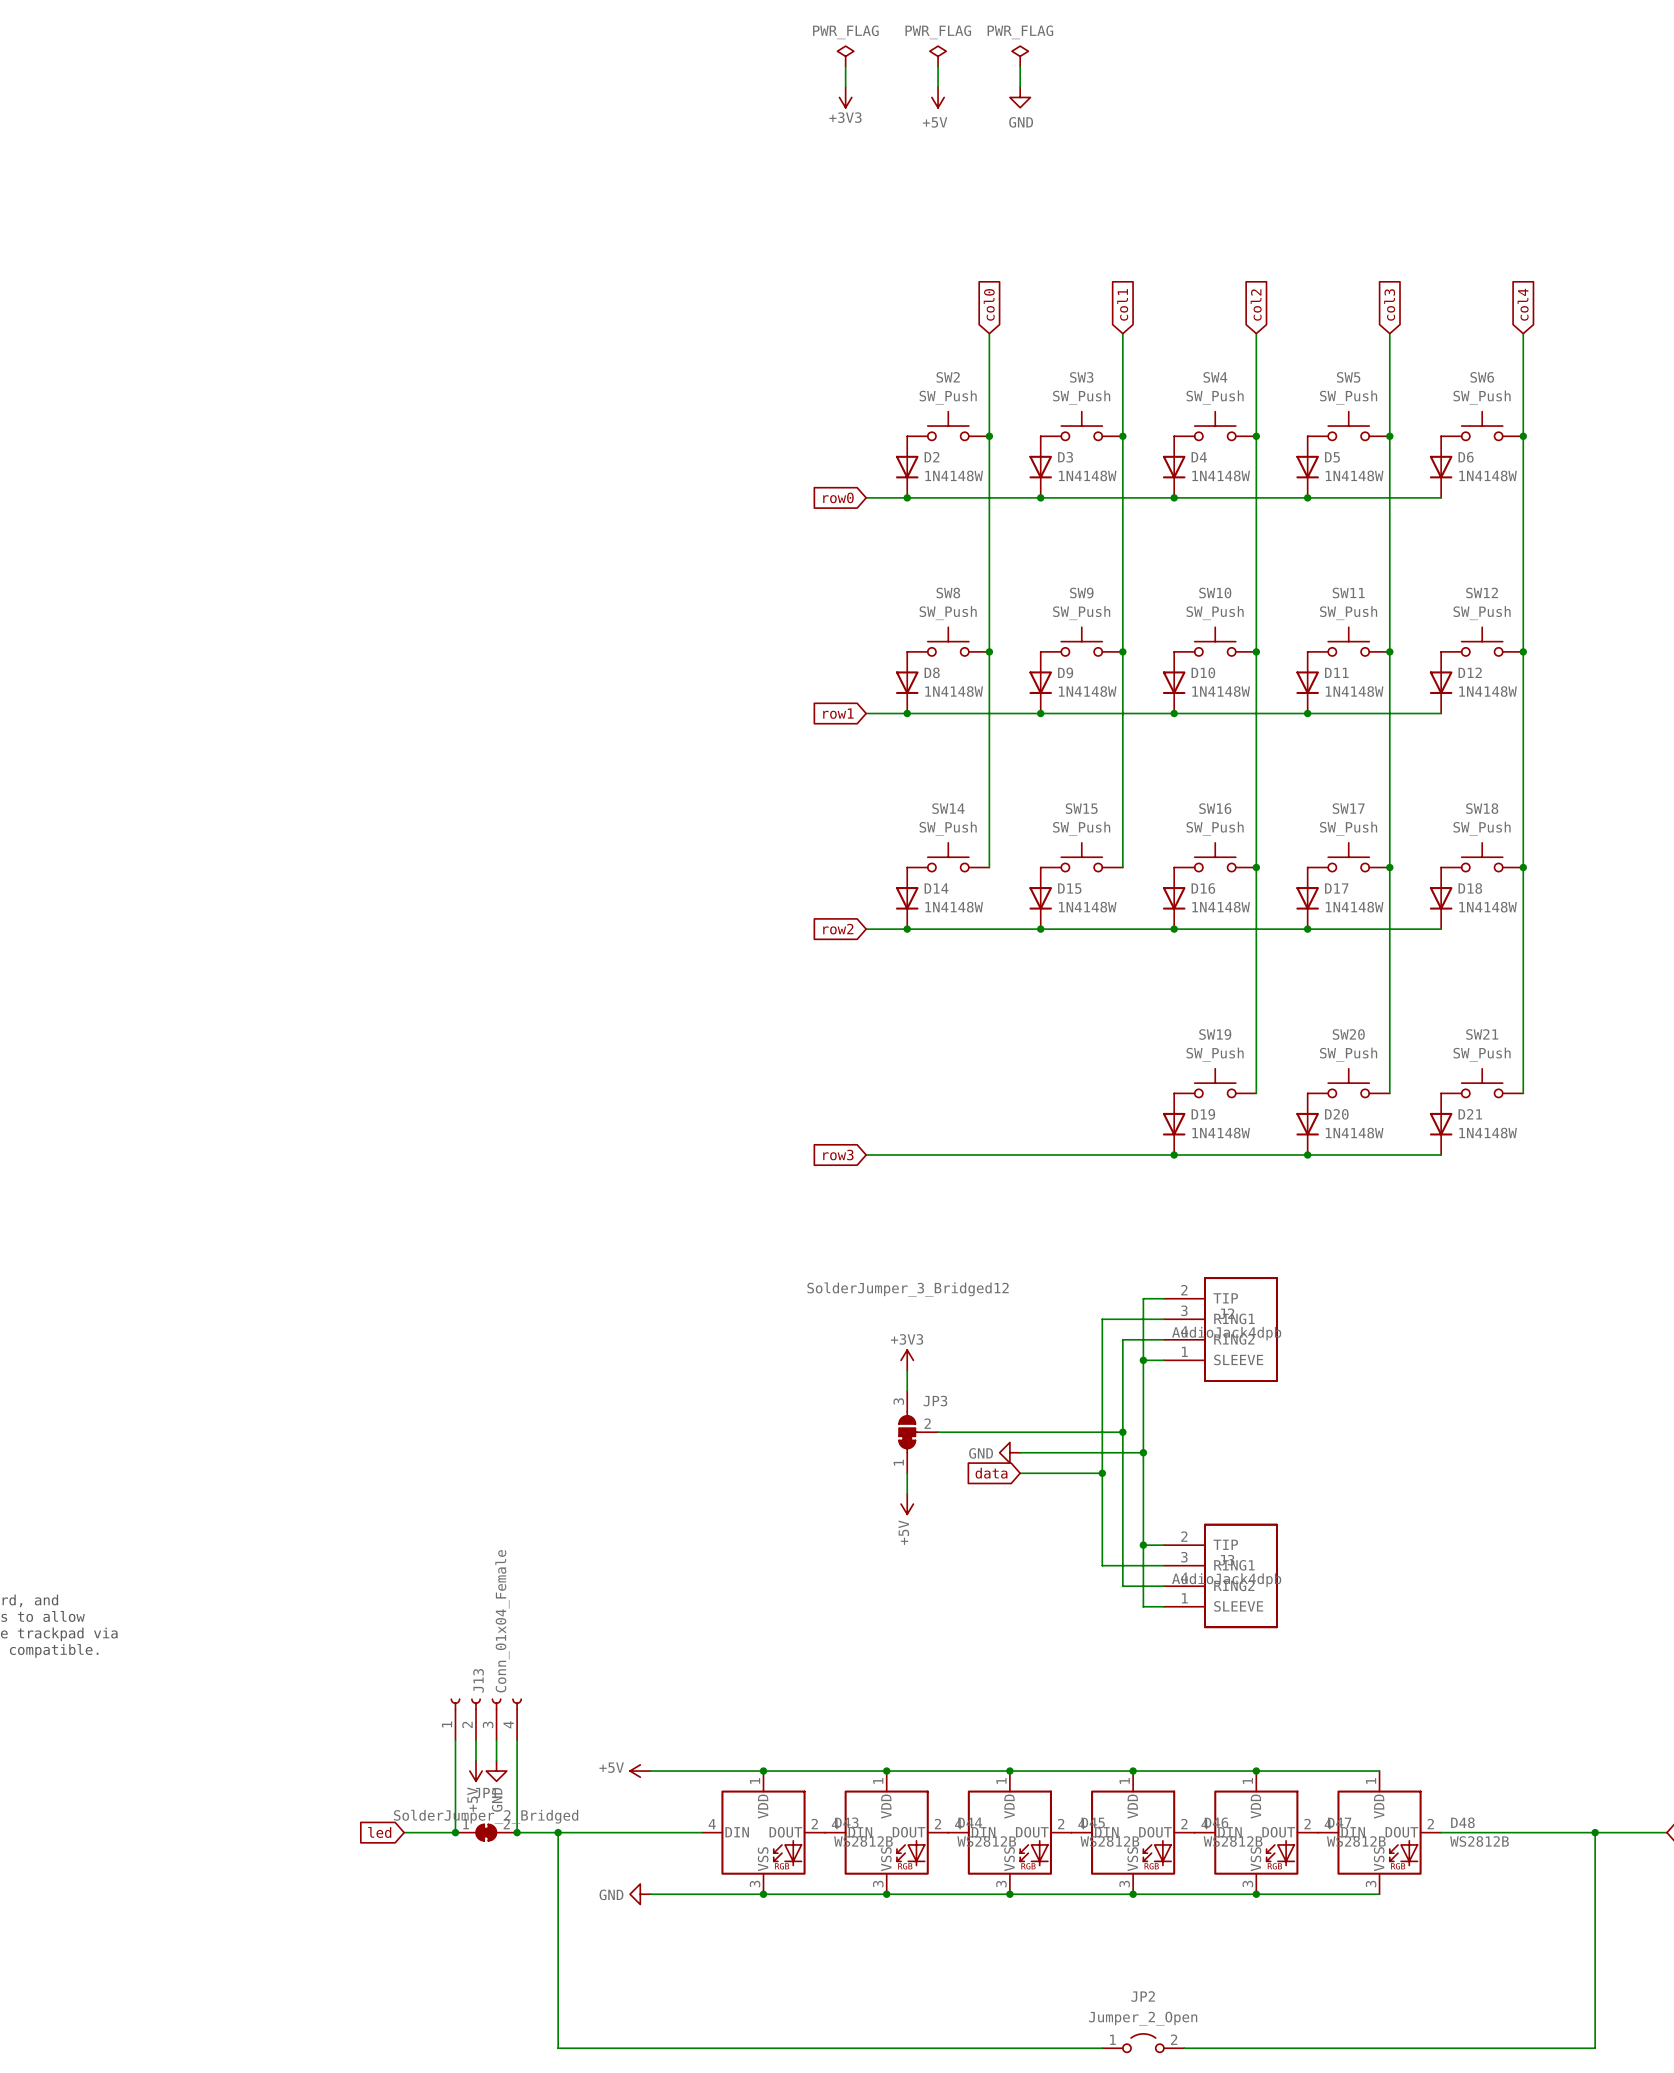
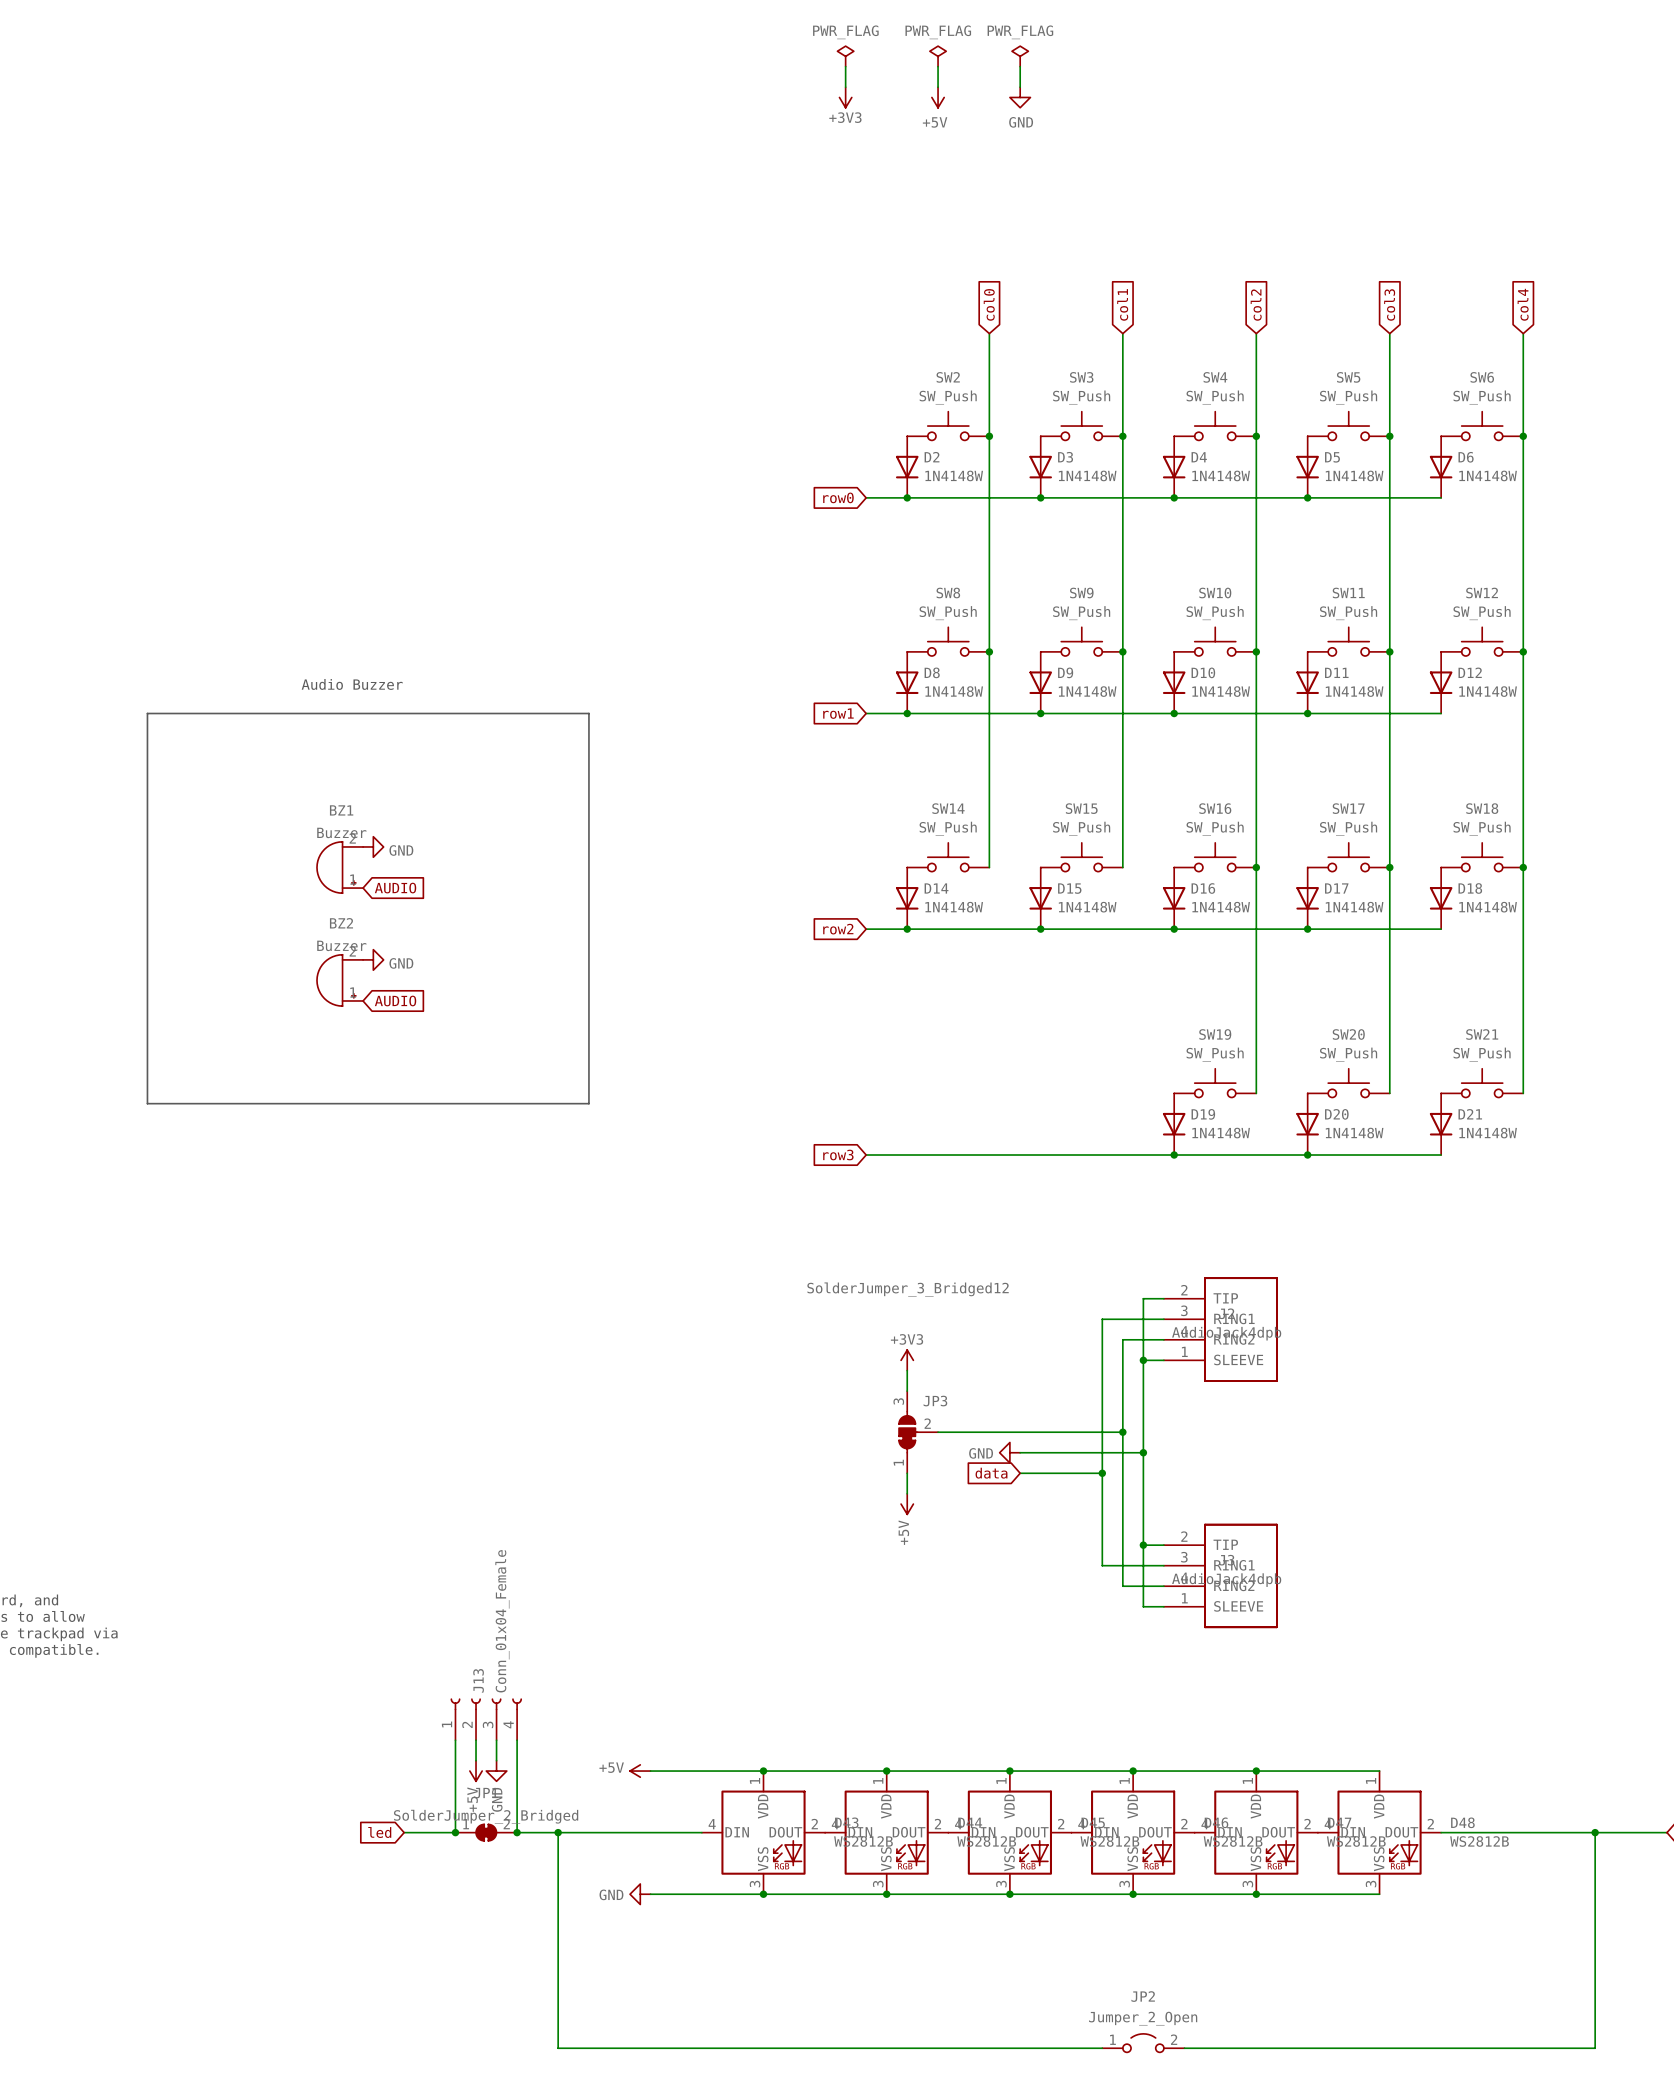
text: none -> Audio Buzzer (352, 684)
line: none -> (147, 713) (588, 713) (588, 1103) (147, 1103) (147, 713)
power symbol: none -> GND (373, 846)
BZ1: none -> Buzzer (340, 867)
global label: none -> AUDIO (395, 888)
power symbol: none -> GND (373, 959)
BZ2: none -> Buzzer (340, 980)
global label: none -> AUDIO (395, 1001)

